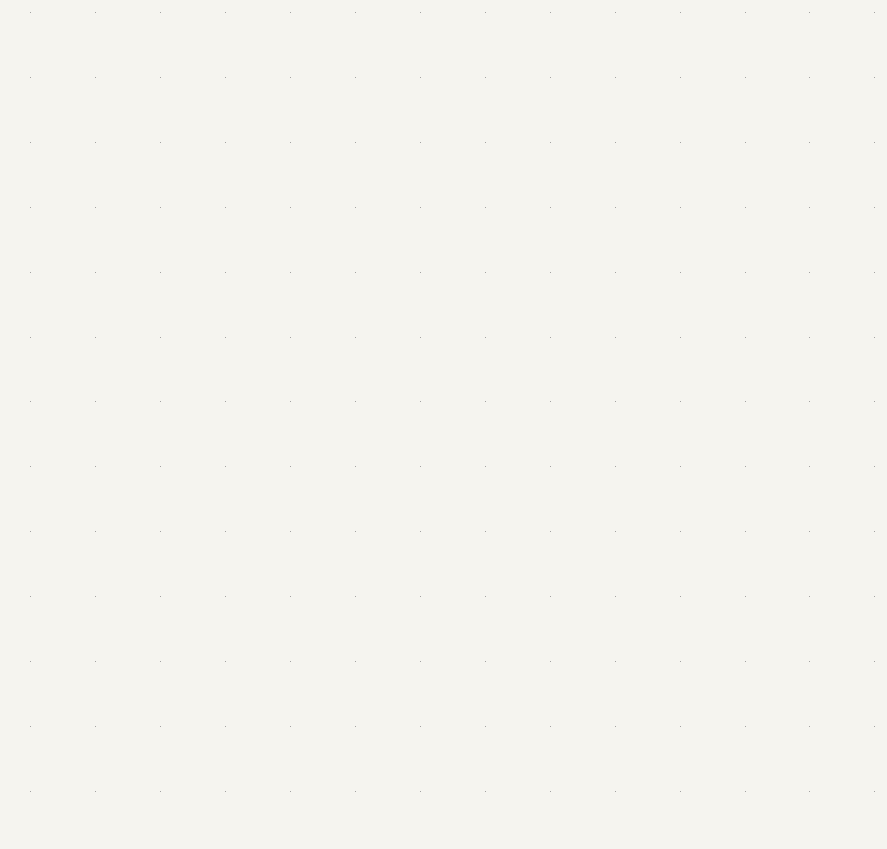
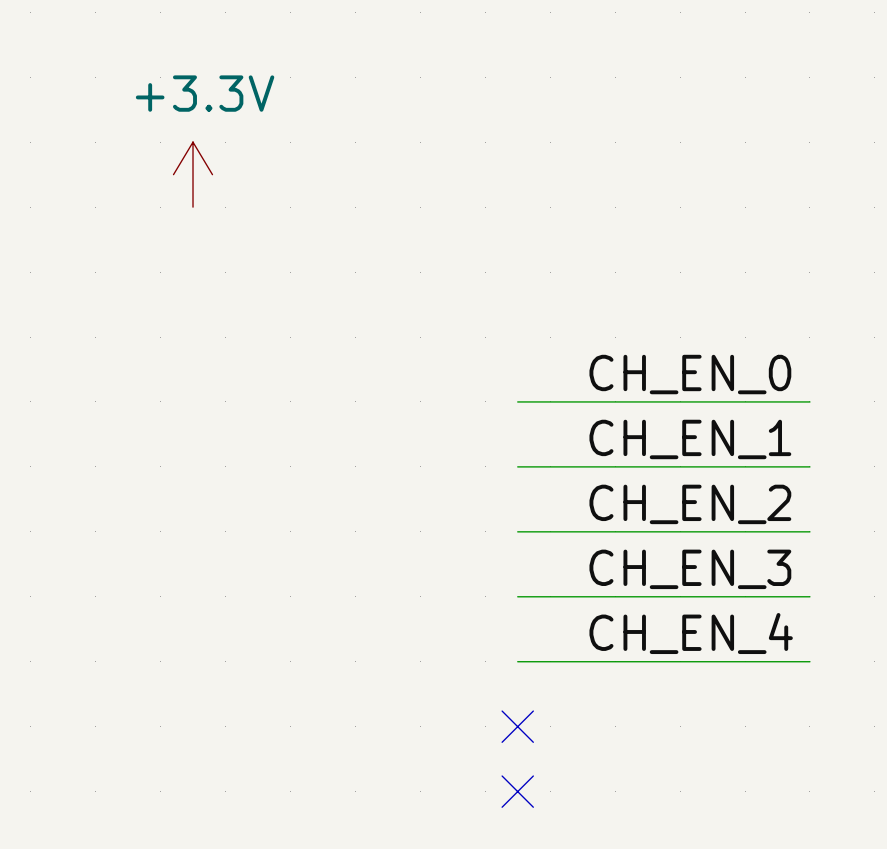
power symbol: none -> +3.3V (193, 174)
label: none -> CH_EN_0 (690, 374)
wire: none -> (517, 401) (809, 401)
label: none -> CH_EN_1 (690, 439)
wire: none -> (517, 466) (809, 466)
label: none -> CH_EN_2 (690, 504)
wire: none -> (517, 531) (809, 531)
label: none -> CH_EN_3 (690, 569)
wire: none -> (517, 596) (809, 596)
label: none -> CH_EN_4 (691, 633)
wire: none -> (517, 661) (809, 661)
no-connect mark: none -> (517, 726)
no-connect mark: none -> (517, 791)

